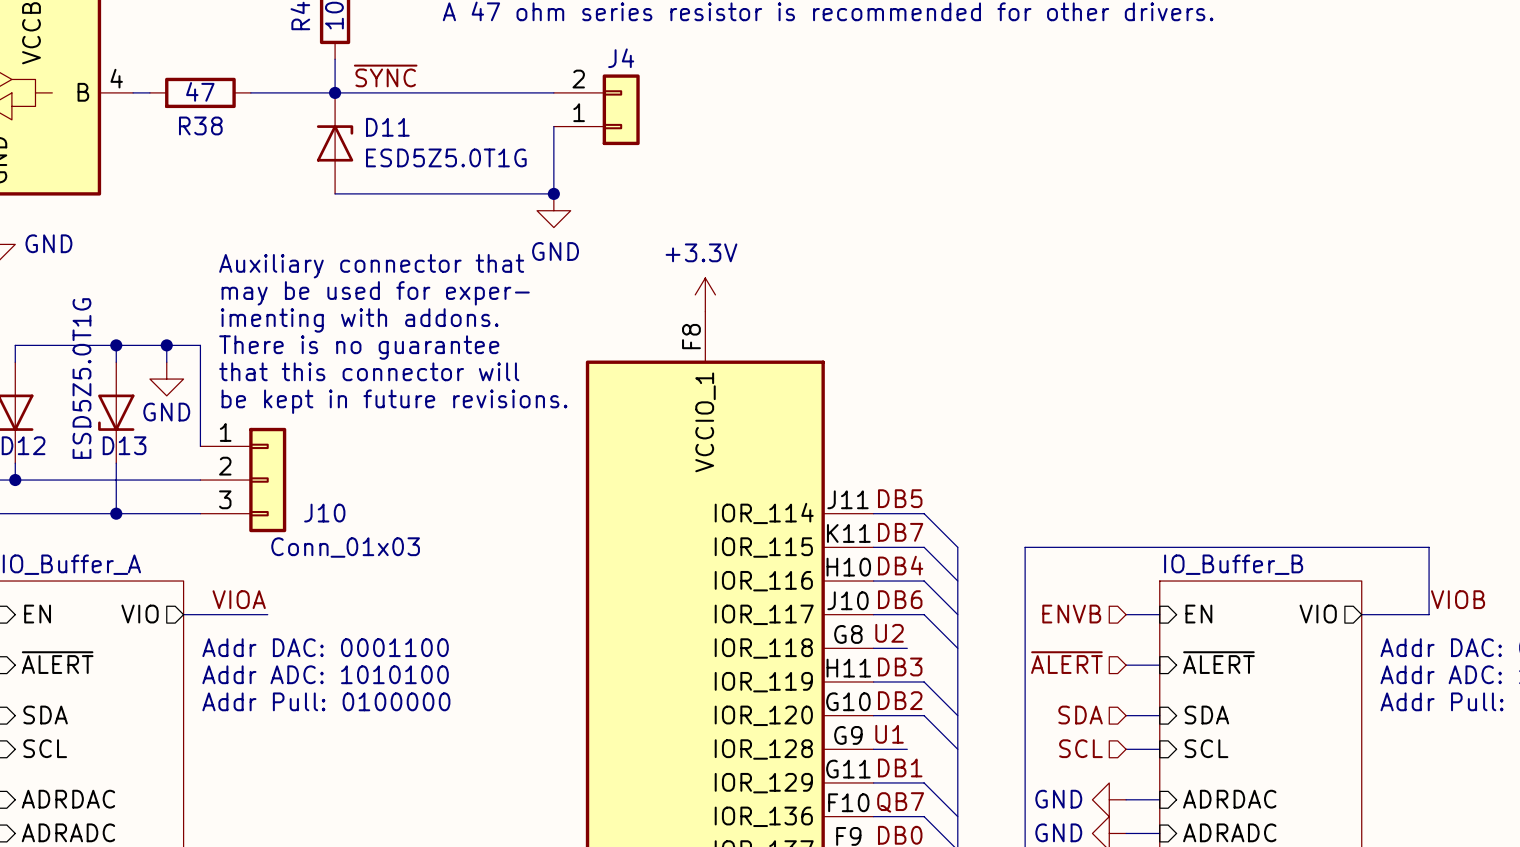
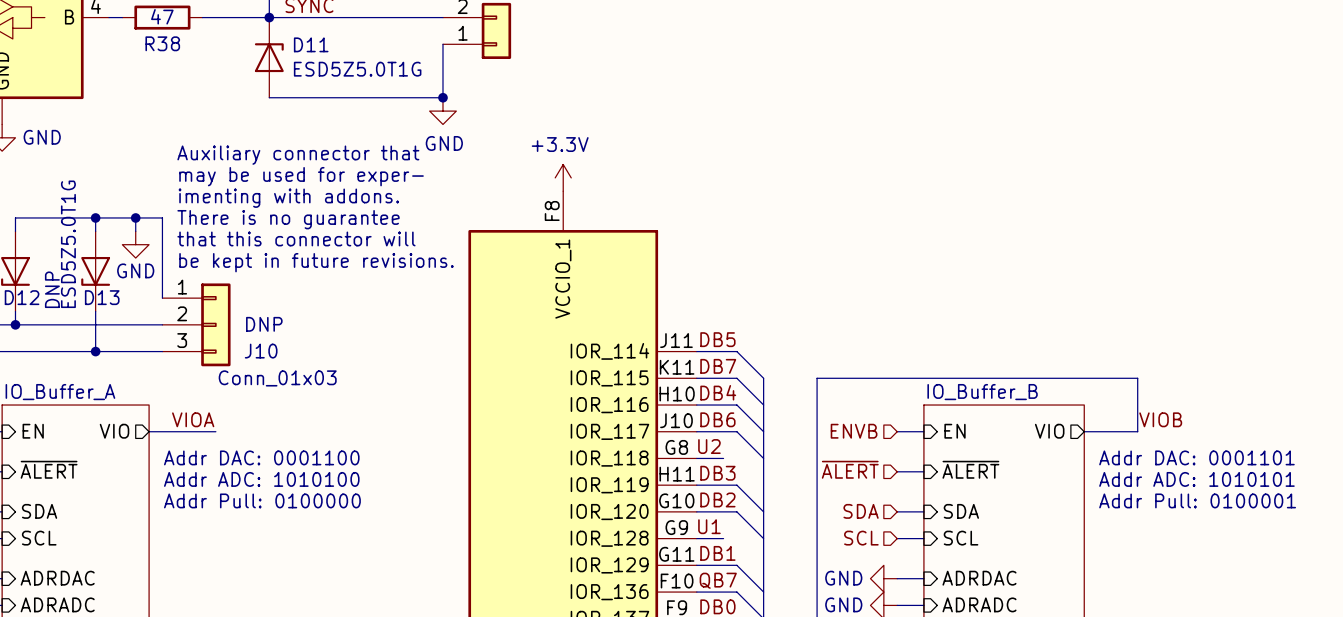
D13 text: none -> DNP (52, 289)
J10 text: none -> DNP (264, 324)

